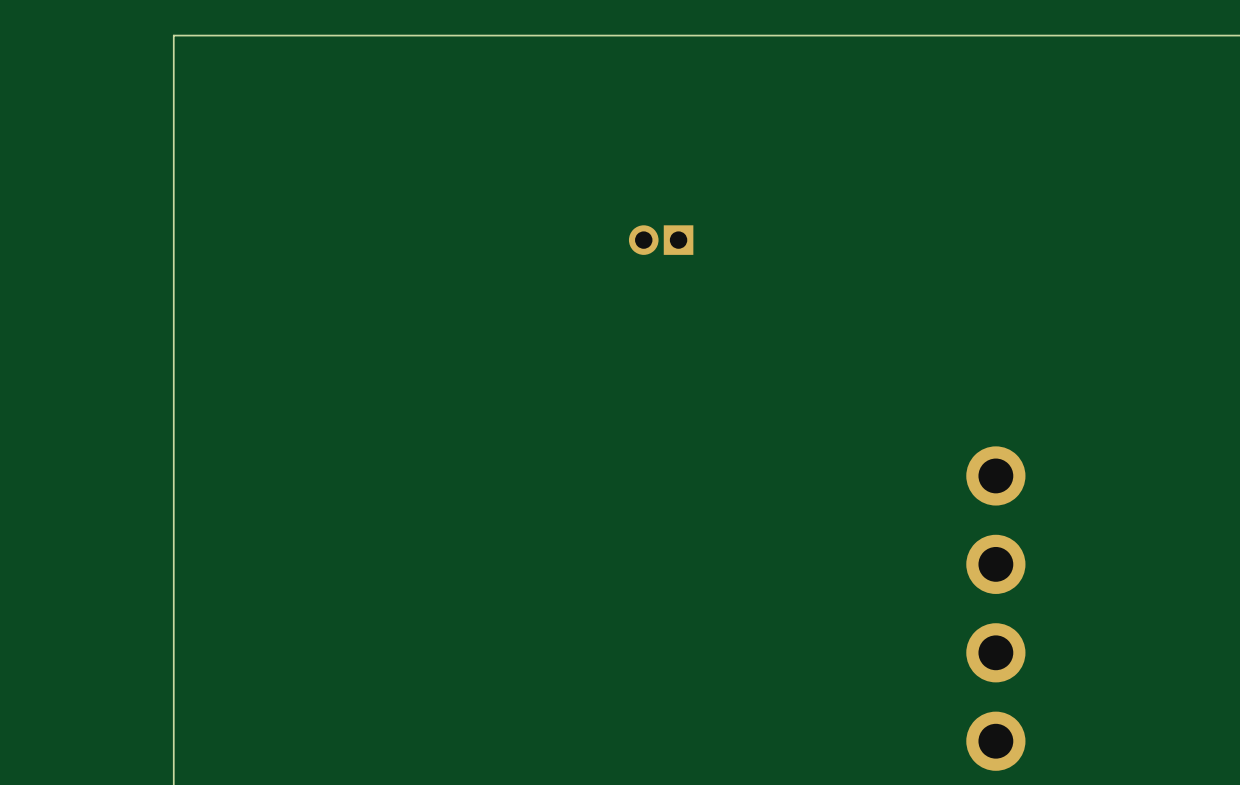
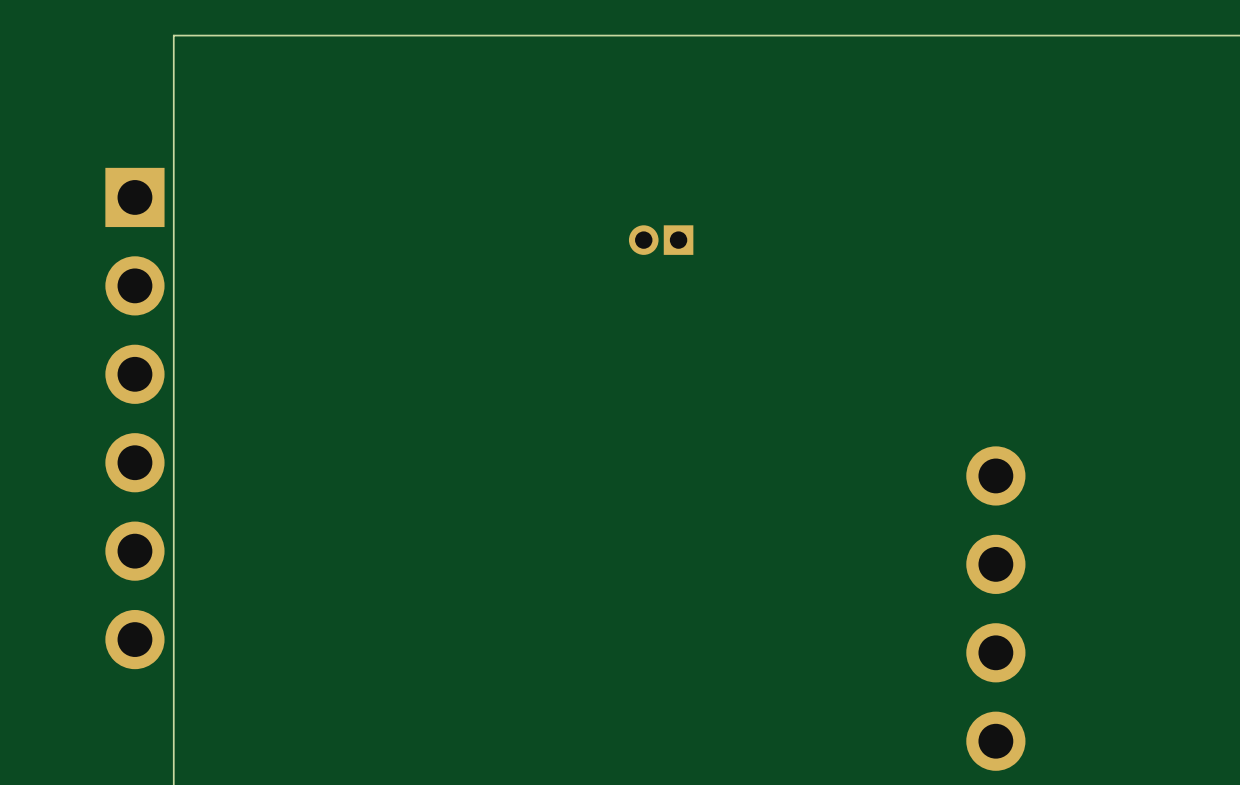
part: none -> (134, 418)

